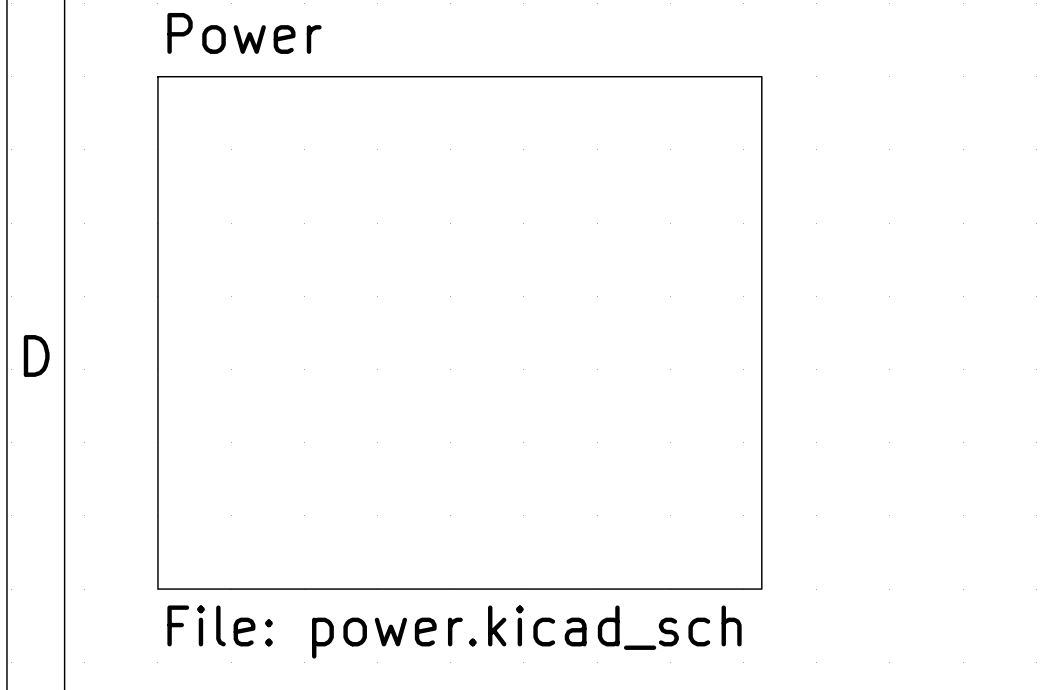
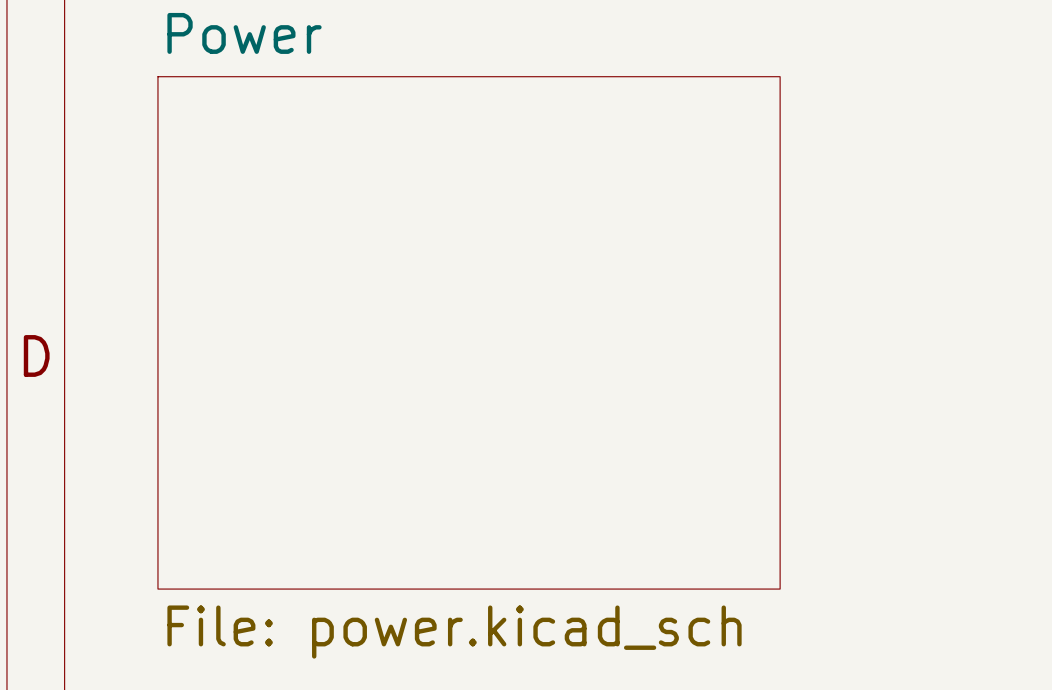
sheet Power shape: [157, 76, 762, 590] -> [157, 76, 781, 590]

